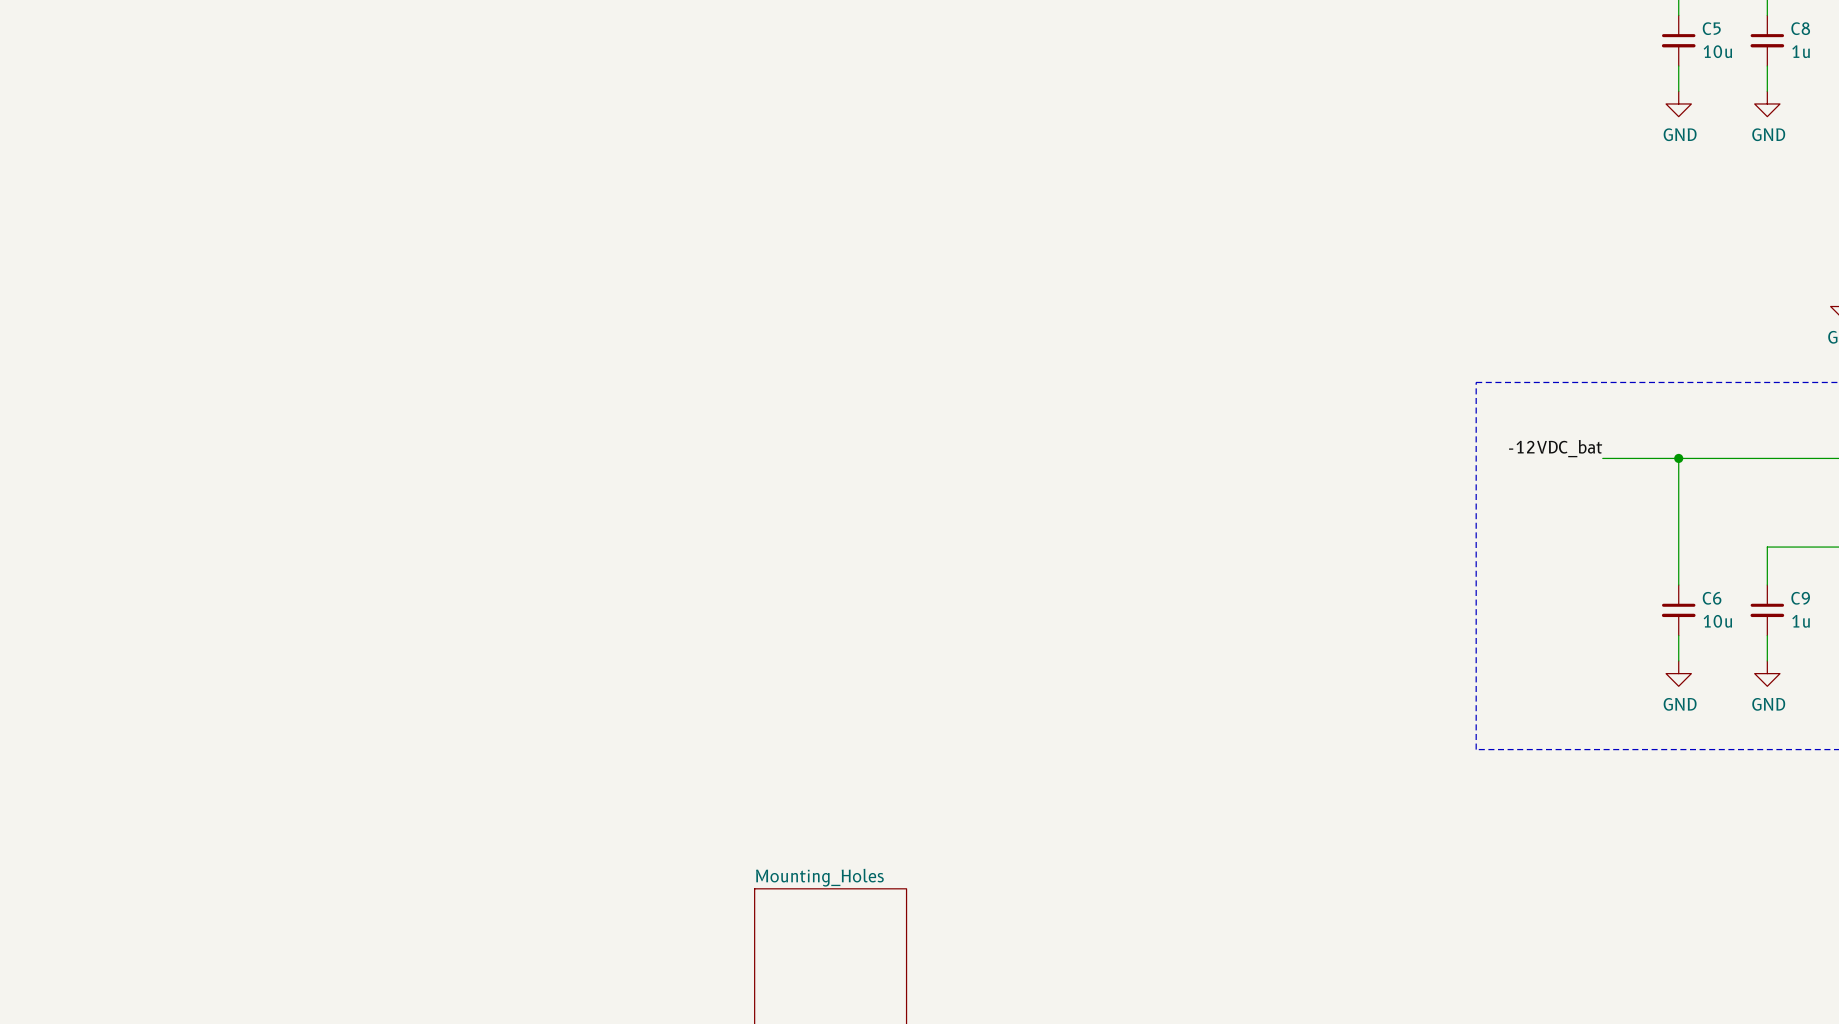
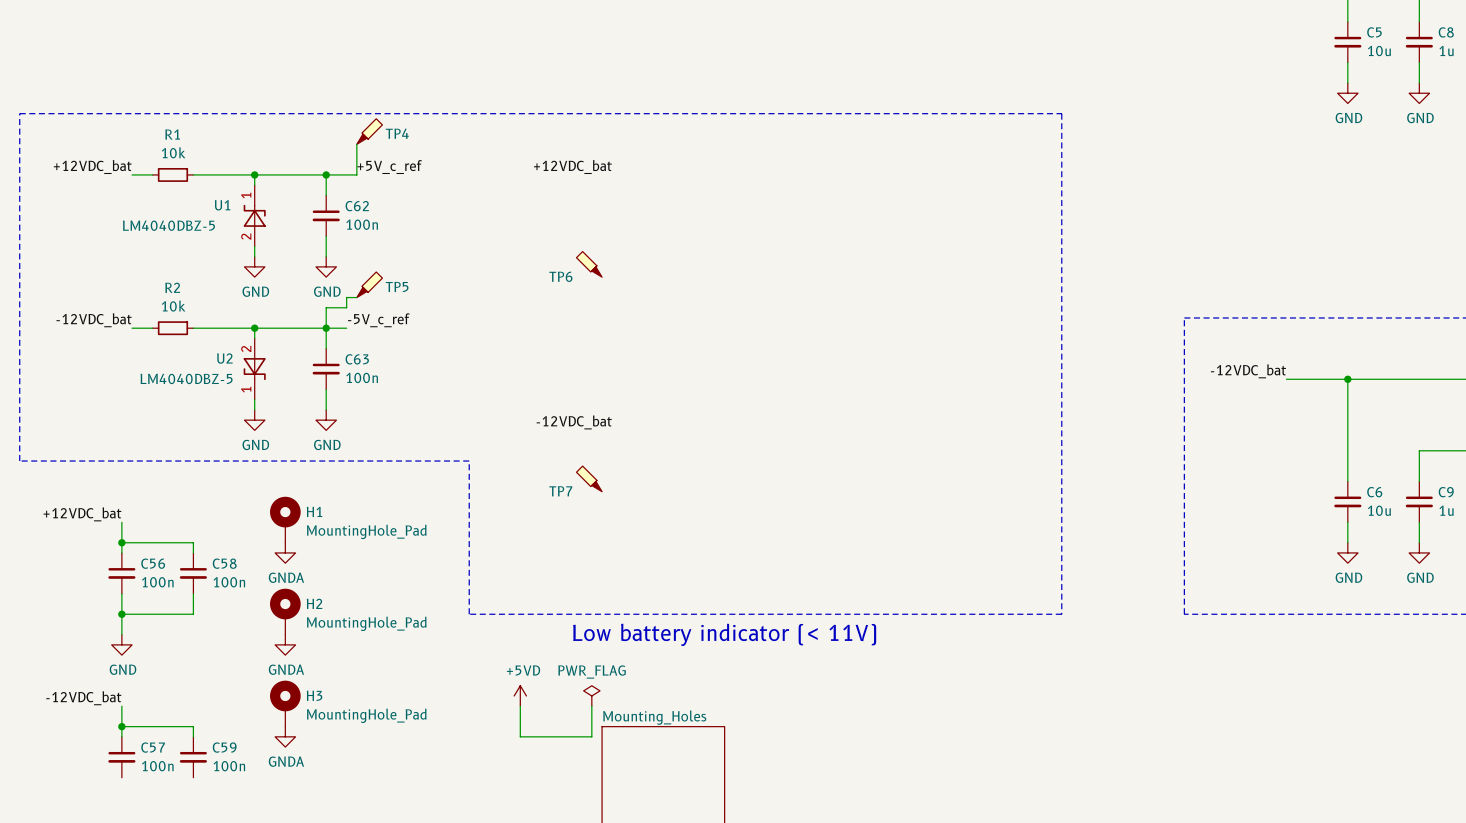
line: none -> (19, 113) (1061, 113) (1061, 614) (469, 614) (469, 461) (19, 461) (19, 113)
TP4: none -> (369, 131)
wire: none -> (356, 144) (356, 174) (193, 174)
label: none -> +12VDC_bat (92, 167)
label: none -> +5V_c_ref (389, 167)
label: none -> +12VDC_bat (572, 167)
wire: none -> (132, 174) (152, 174)
R1: none -> 10k (172, 174)
wire: none -> (254, 174) (254, 185)
junction: none -> (254, 174)
wire: none -> (326, 174) (326, 195)
junction: none -> (326, 174)
U1: none -> LM4040DBZ-5 (254, 215)
C62: none -> 100n (326, 215)
wire: none -> (326, 236) (326, 256)
wire: none -> (254, 246) (254, 256)
TP6: none -> (589, 264)
power symbol: none -> GND (254, 266)
power symbol: none -> GND (326, 266)
TP5: none -> (369, 284)
wire: none -> (356, 297) (346, 297) (346, 307) (326, 307) (326, 348)
label: none -> -12VDC_bat (94, 320)
label: none -> -5V_c_ref (378, 320)
wire: none -> (132, 328) (152, 328)
R2: none -> 10k (172, 328)
wire: none -> (193, 328) (346, 328)
wire: none -> (254, 328) (254, 338)
junction: none -> (254, 328)
junction: none -> (326, 328)
U2: none -> LM4040DBZ-5 (254, 369)
C63: none -> 100n (326, 369)
wire: none -> (326, 389) (326, 409)
wire: none -> (254, 399) (254, 409)
power symbol: none -> GND (254, 420)
power symbol: none -> GND (326, 420)
label: none -> -12VDC_bat (574, 422)
TP7: none -> (589, 478)
label: none -> +12VDC_bat (82, 514)
H1: none -> MountingHole_Pad (285, 519)
wire: none -> (121, 522) (121, 552)
wire: none -> (121, 542) (193, 542) (193, 552)
junction: none -> (121, 542)
power symbol: none -> GNDA (285, 552)
C56: none -> 100n (121, 573)
C58: none -> 100n (193, 573)
wire: none -> (121, 593) (121, 634)
wire: none -> (193, 593) (193, 614) (121, 614)
H2: none -> MountingHole_Pad (285, 611)
junction: none -> (121, 614)
text: none -> Low battery indicator (< 11V) (724, 634)
power symbol: none -> GND (121, 644)
power symbol: none -> GNDA (285, 644)
power symbol: none -> +5VD (520, 695)
power symbol: none -> PWR_FLAG (591, 695)
label: none -> -12VDC_bat (83, 698)
H3: none -> MountingHole_Pad (285, 703)
wire: none -> (121, 706) (121, 736)
wire: none -> (520, 706) (520, 736) (591, 736) (591, 706)
wire: none -> (121, 726) (193, 726) (193, 736)
junction: none -> (121, 726)
power symbol: none -> GNDA (285, 736)
C57: none -> 100n (121, 757)
C59: none -> 100n (193, 757)

